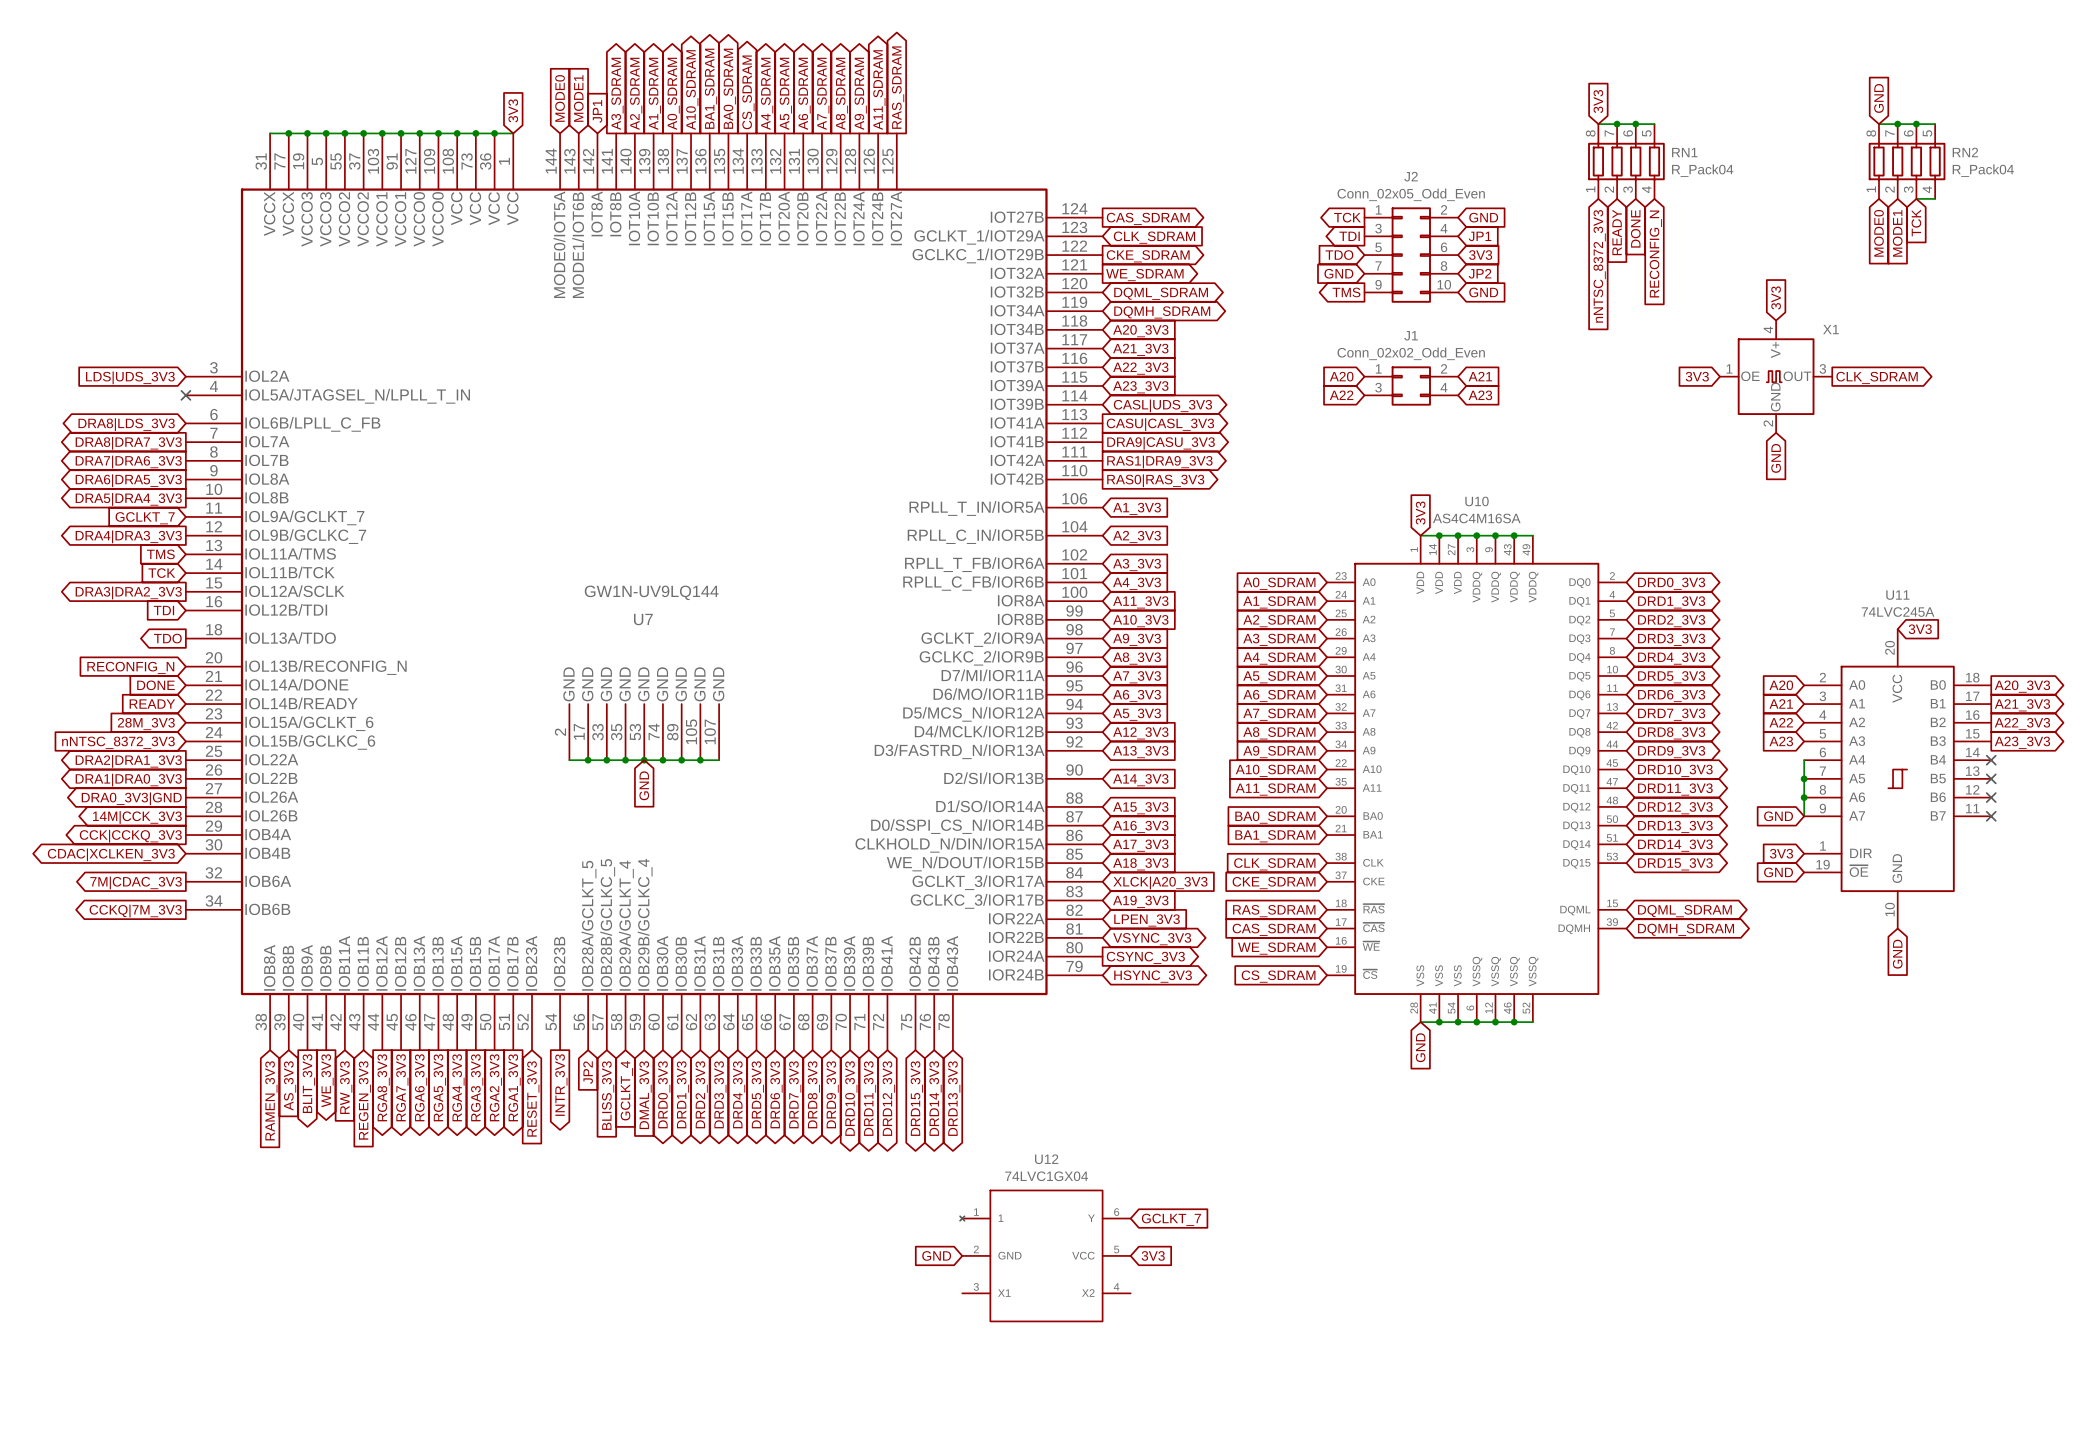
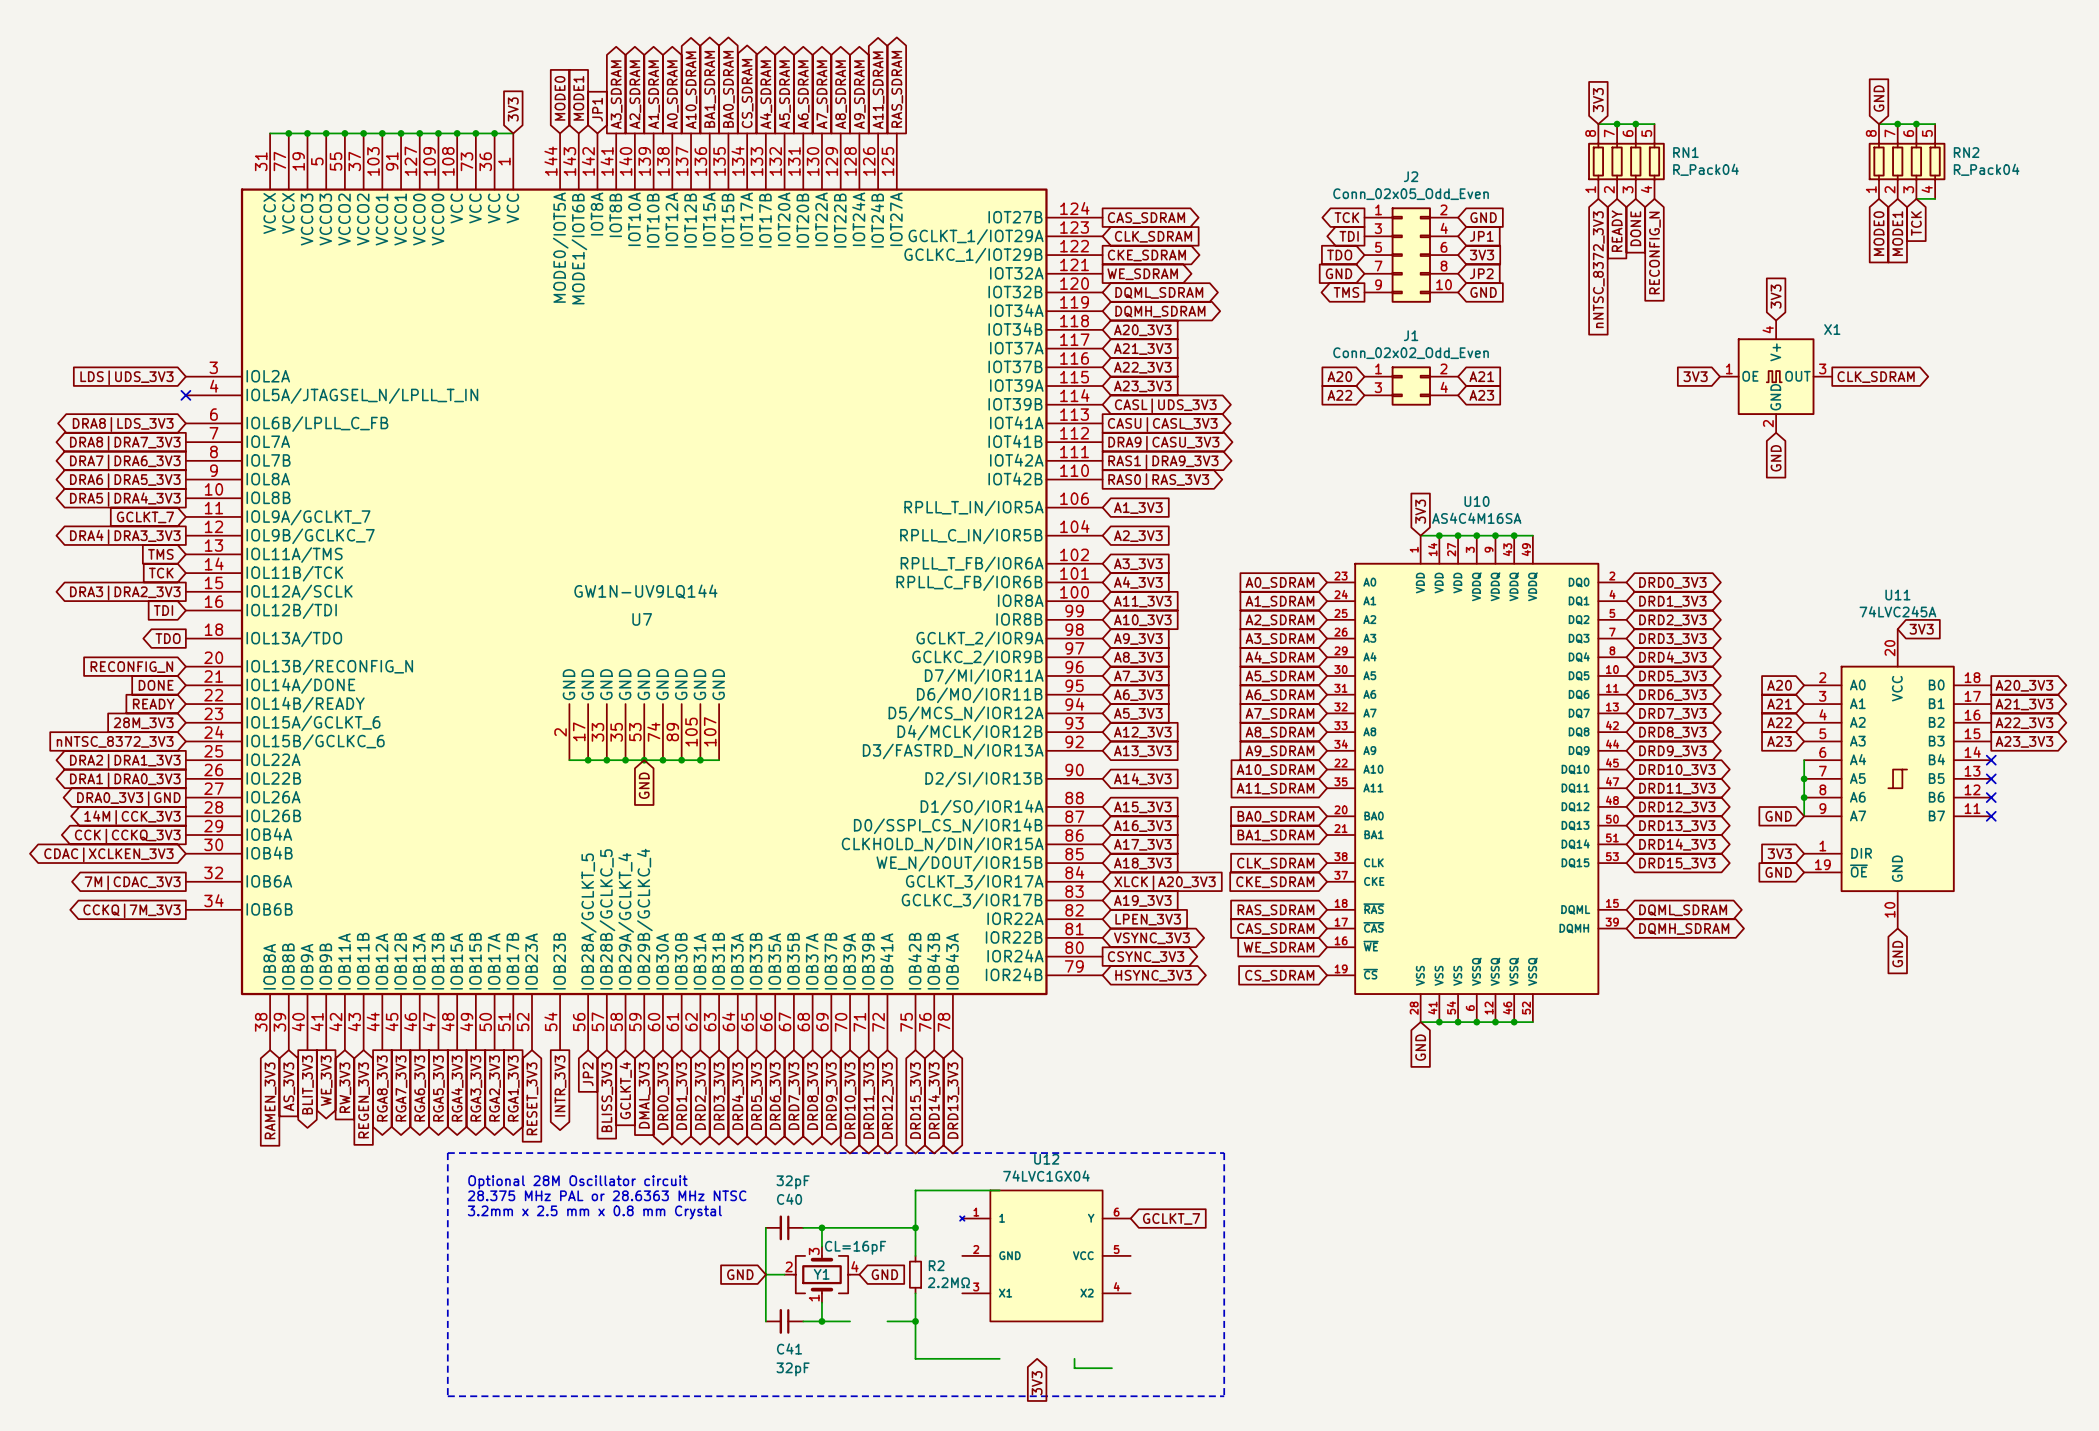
line: none -> (447, 1153) (447, 1396) (1224, 1396) (1224, 1153) (447, 1153)
text: none -> Optional 28M Oscillator circuit (577, 1182)
wire: none -> (999, 1190) (915, 1190) (915, 1255)
text: none -> 28.375 MHz PAL or 28.6363 MHz NTSC (607, 1195)
text: none -> 3.2mm x 2.5 mm x 0.8 mm Crystal (594, 1212)
wire: none -> (765, 1227) (765, 1321)
C40: none -> 32pF (784, 1227)
wire: none -> (803, 1227) (915, 1227)
wire: none -> (821, 1227) (821, 1246)
junction: none -> (821, 1227)
junction: none -> (915, 1227)
global label rotation: 0° (936, 1255) -> 180° (884, 1274)
global label rotation: 0° (1153, 1255) -> 90° clockwise (1037, 1383)
global label position: 3V3 (1153, 1255) -> 3V3 (1037, 1383)
global label: none -> GND (740, 1274)
wire: none -> (765, 1274) (784, 1274)
Y1: none -> CL=16pF (821, 1274)
R2: none -> 2.2MΩ (915, 1274)
wire: none -> (915, 1293) (915, 1358) (999, 1358)
wire: none -> (821, 1302) (821, 1321)
C41: none -> 32pF (784, 1321)
wire: none -> (803, 1321) (850, 1321)
junction: none -> (821, 1321)
wire: none -> (887, 1321) (915, 1321)
junction: none -> (915, 1321)
wire: none -> (1074, 1358) (1074, 1368) (1111, 1368)

